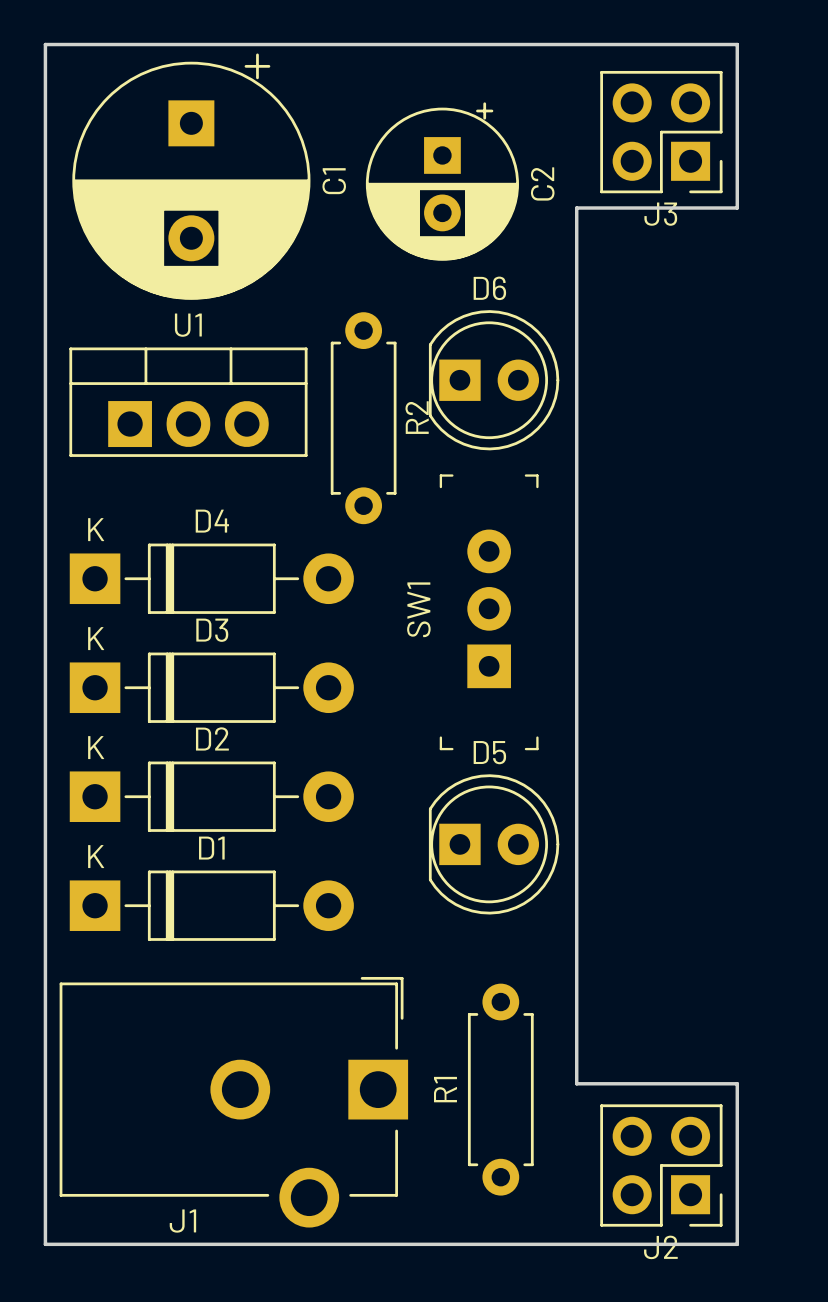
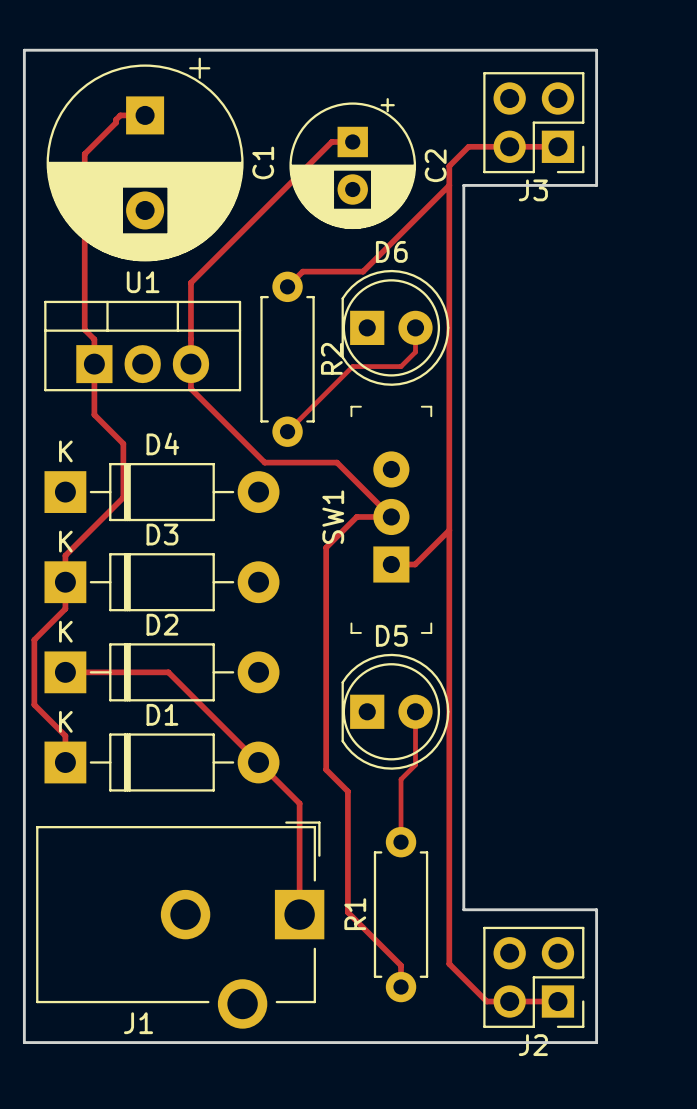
track: none -> (145, 115) (120, 115) (116, 119) (116, 122) (84, 154) (84, 329) (94, 339) (94, 414) (123, 443) (123, 497) (65, 555) (65, 608) (34, 639) (34, 704) (65, 735) (65, 762)
track: none -> (352, 141) (331, 141) (190, 282) (190, 388) (264, 462) (336, 462) (391, 516) (356, 516) (326, 547) (326, 769) (347, 791) (347, 912) (401, 965) (401, 987)
track: none -> (557, 146) (468, 146) (449, 166) (449, 964) (486, 1001) (557, 1001)
track: none -> (449, 185) (363, 271) (302, 271) (287, 286)
track: none -> (415, 327) (415, 352) (401, 366) (352, 366) (287, 431)
track: none -> (449, 530) (415, 564) (391, 564)
track: none -> (65, 672) (168, 672) (299, 803) (299, 914)
track: none -> (415, 711) (415, 764) (401, 779) (401, 842)

